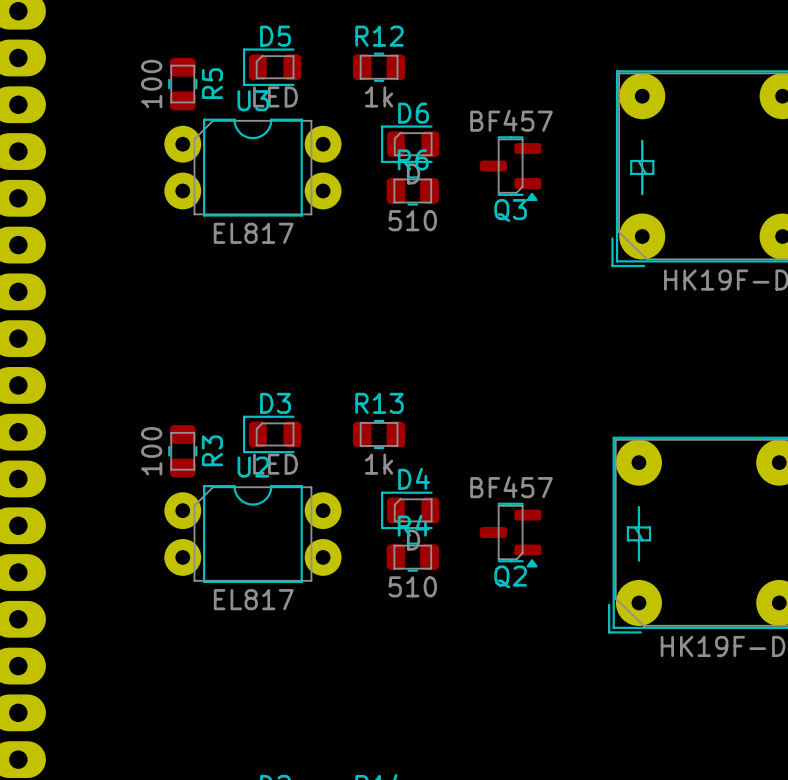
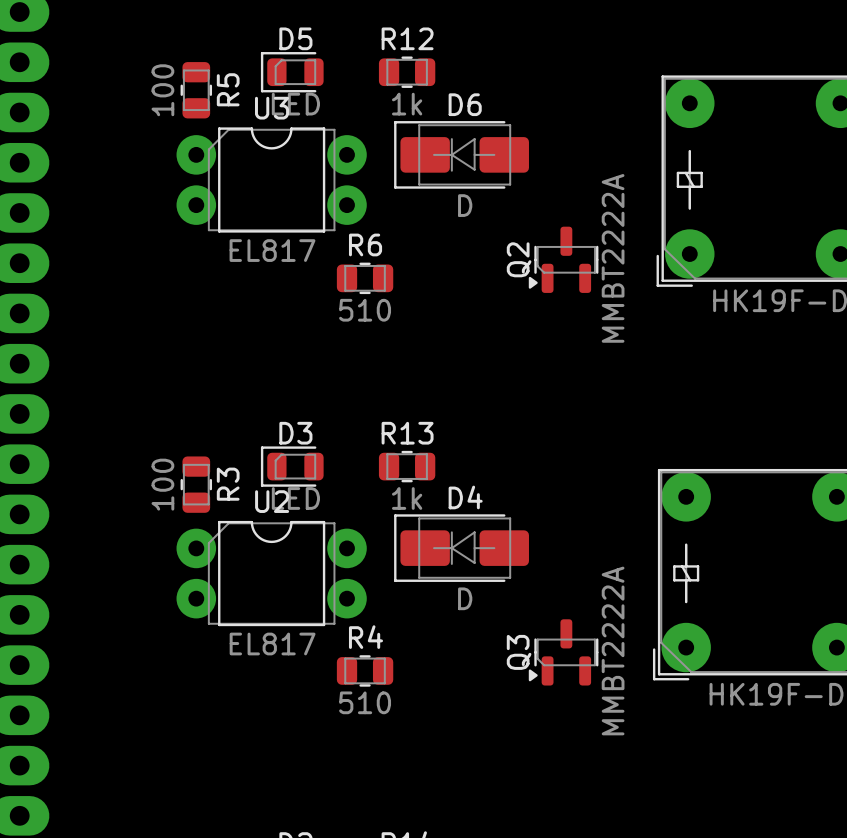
Q3 value: BF457 (511, 120) -> MMBT2222A (613, 650)
D6 footprint: [381, 125, 440, 164] -> [394, 121, 529, 189]
Q3 rotation: 0° (510, 168) -> 90° clockwise (563, 652)
Q3 position: (510, 168) -> (563, 652)
R6 position: (412, 190) -> (365, 278)
Q2 value: BF457 (511, 487) -> MMBT2222A (613, 258)
D4 footprint: [381, 491, 440, 530] -> [394, 514, 529, 582]
Q2 rotation: 0° (510, 535) -> 90° clockwise (563, 259)
Q2 position: (510, 535) -> (563, 259)
R4 position: (412, 557) -> (365, 670)

